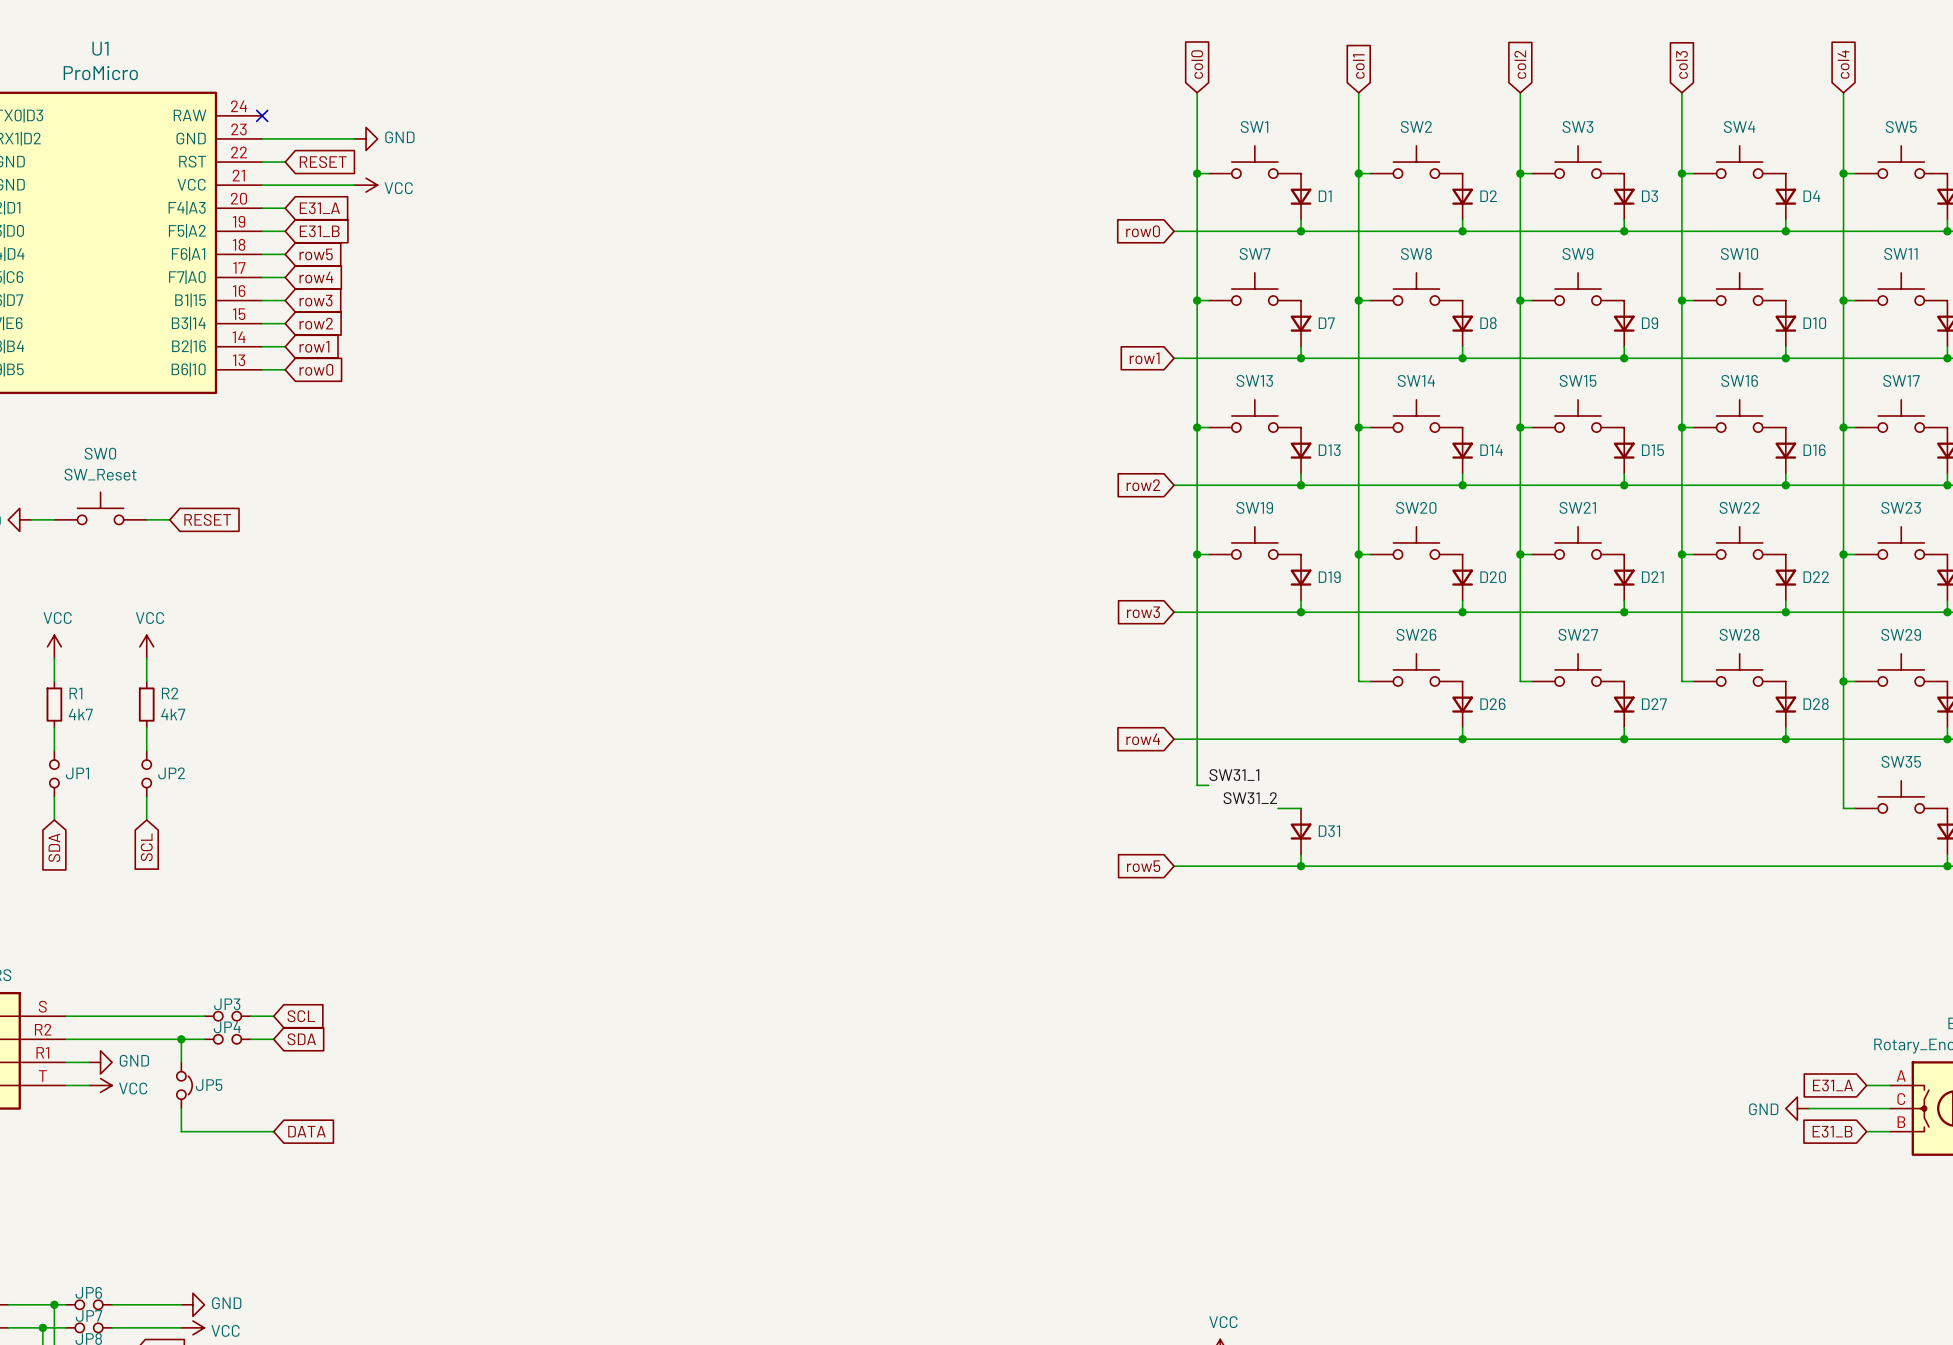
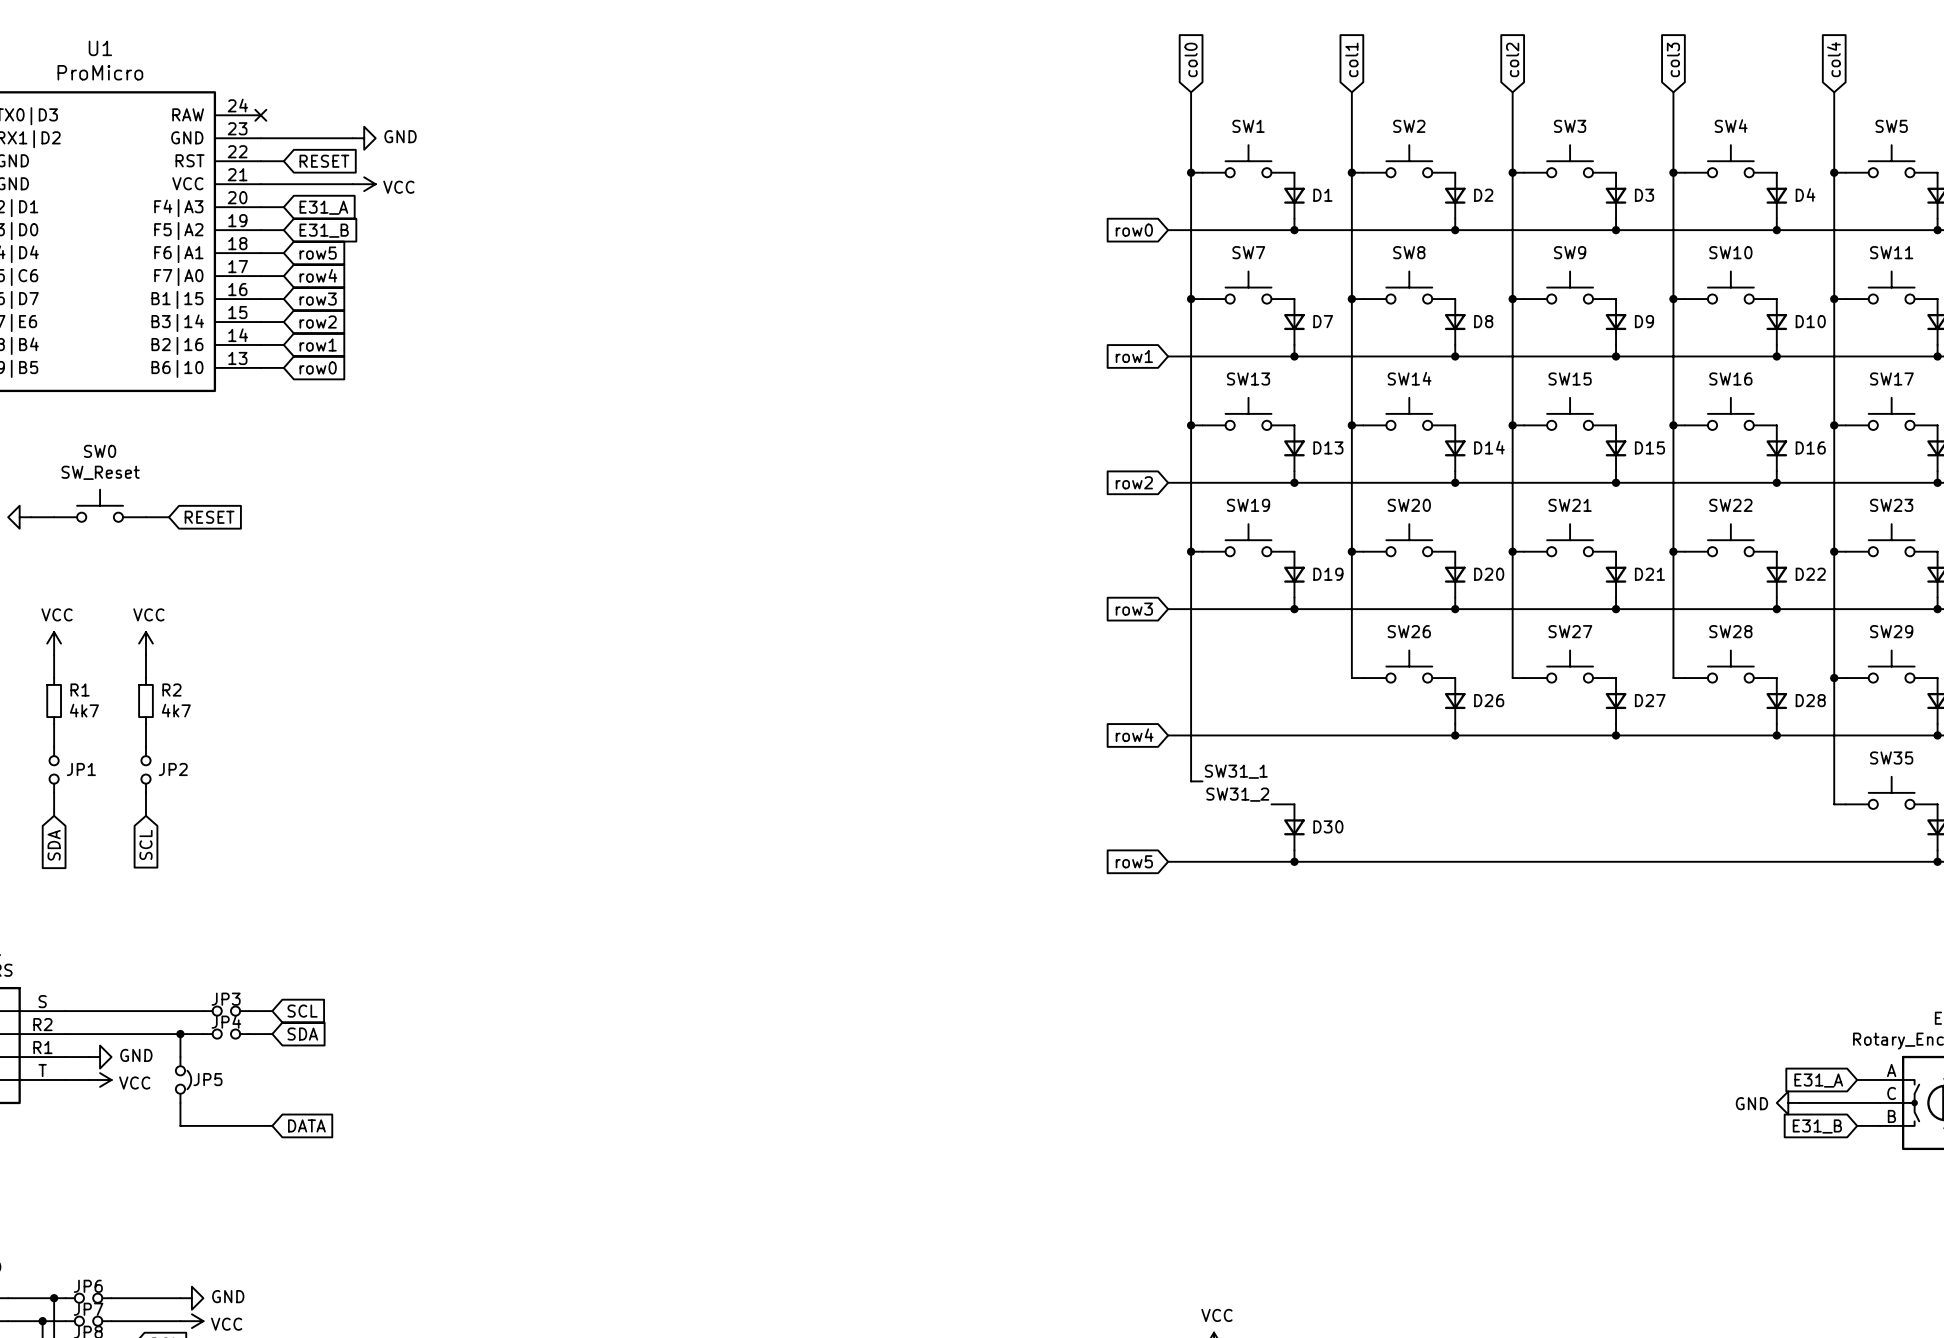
D31 name: D31 (1329, 831) -> D30 (1328, 826)

